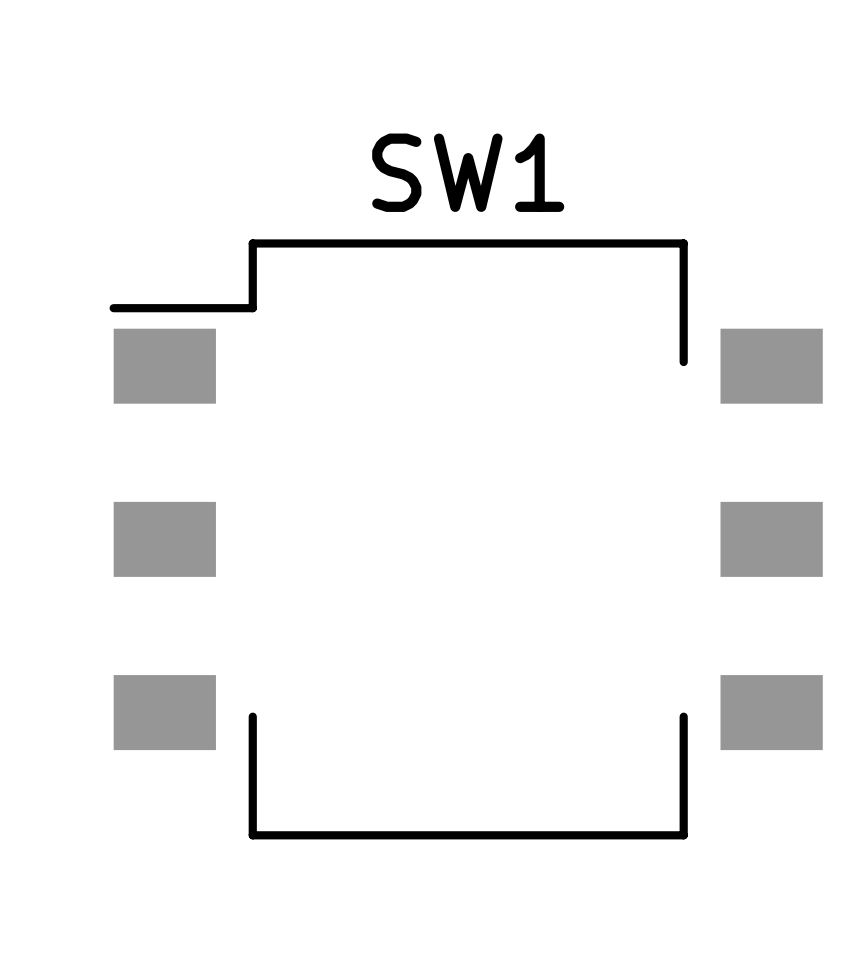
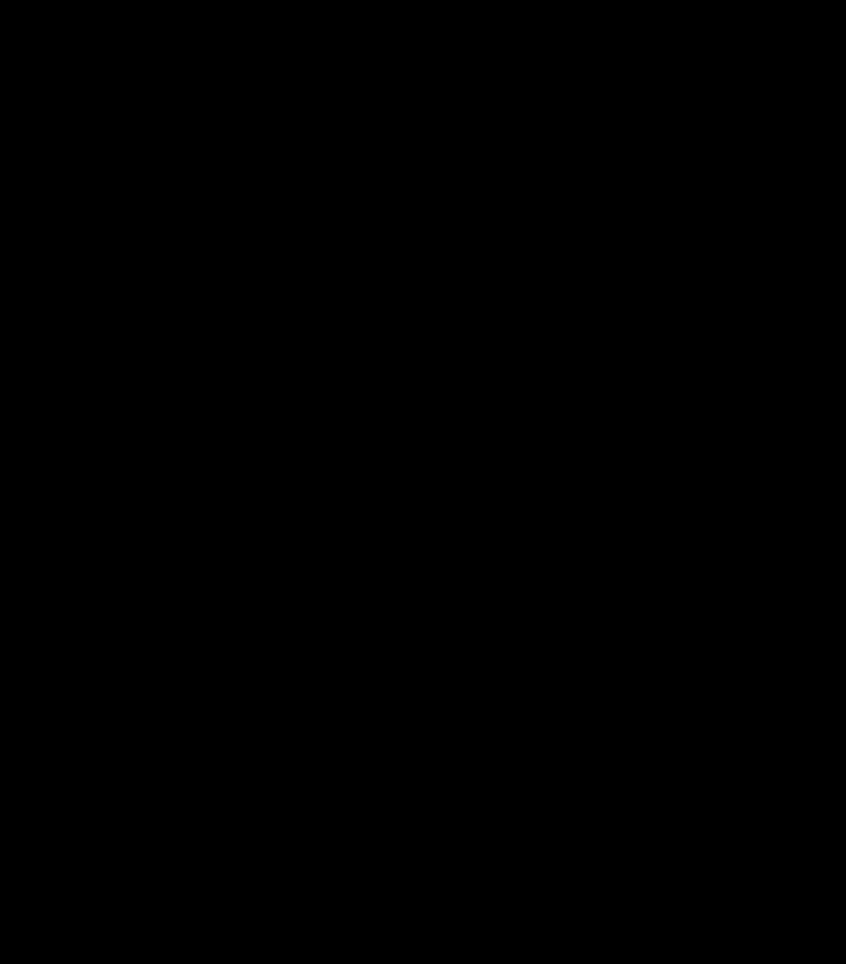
SW1: (466, 539) -> none

